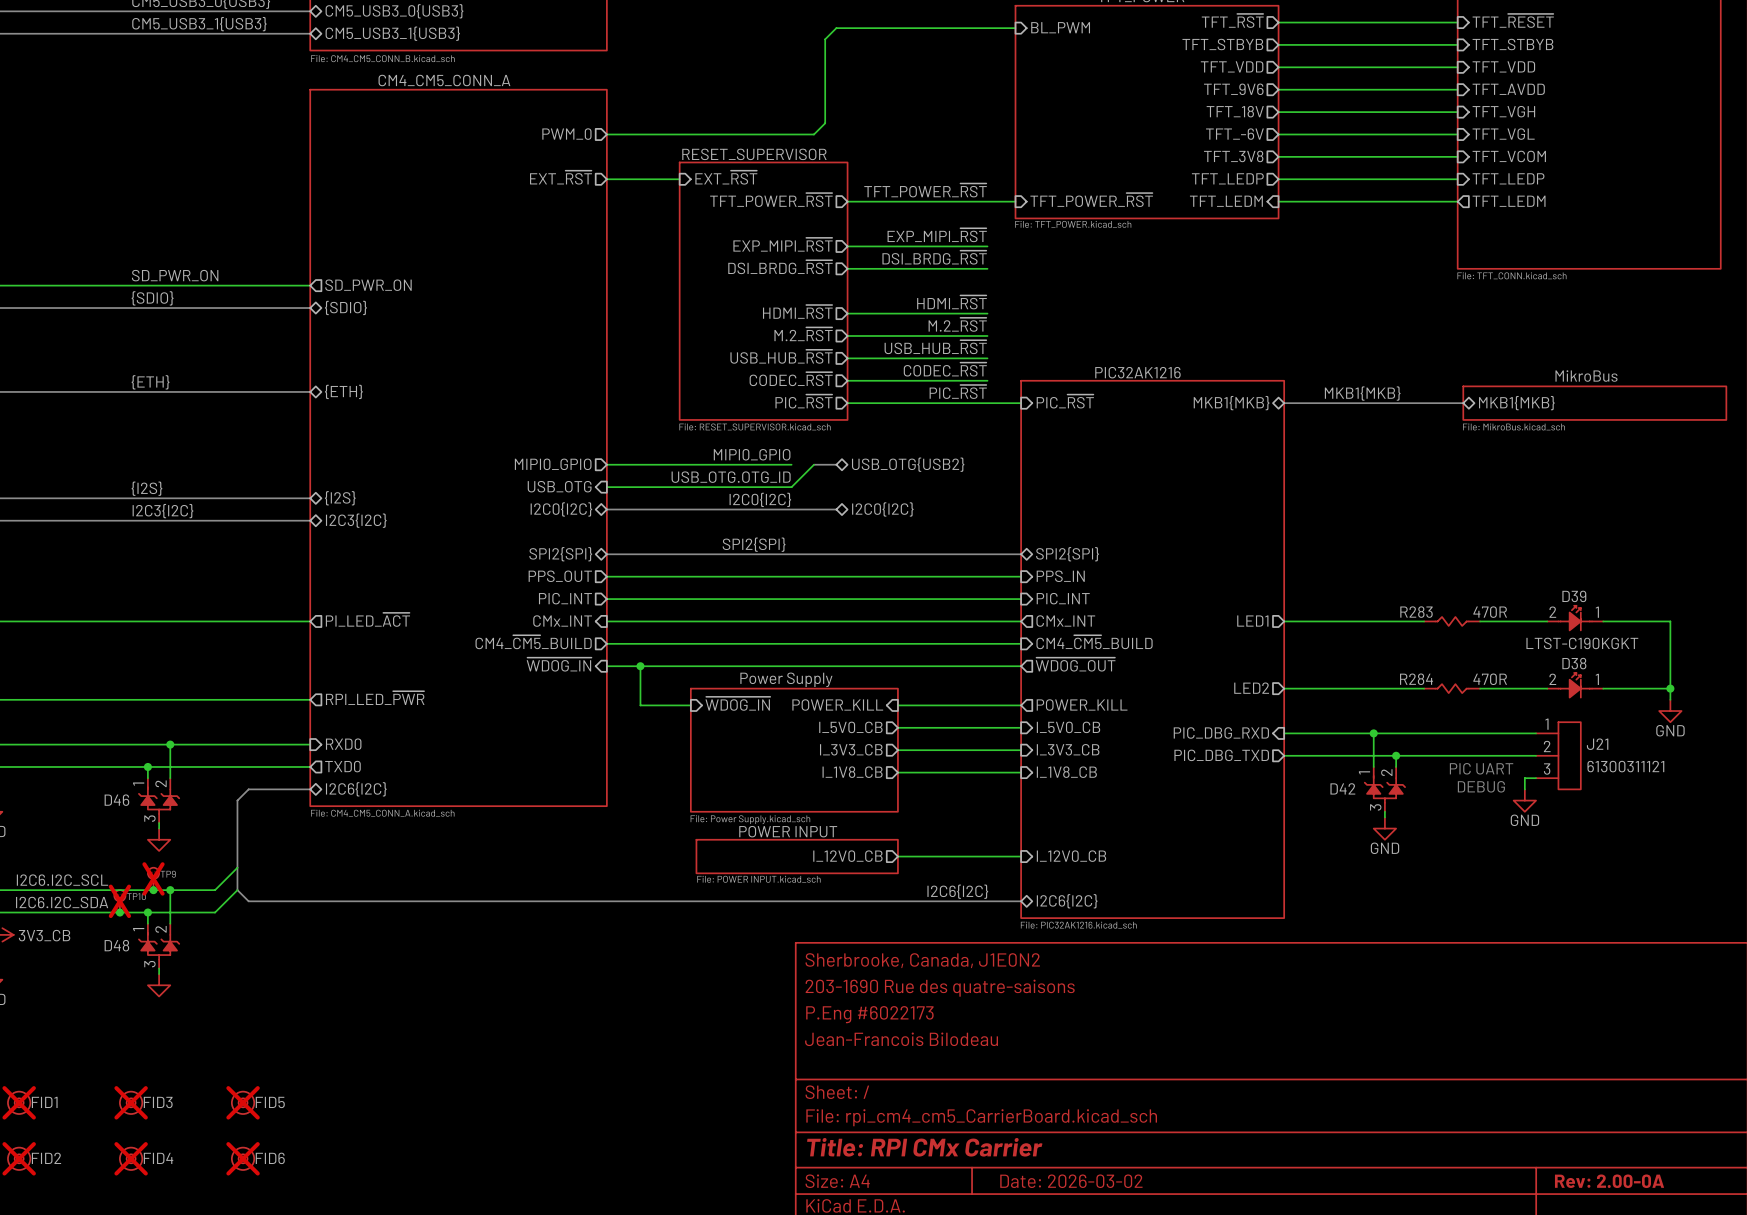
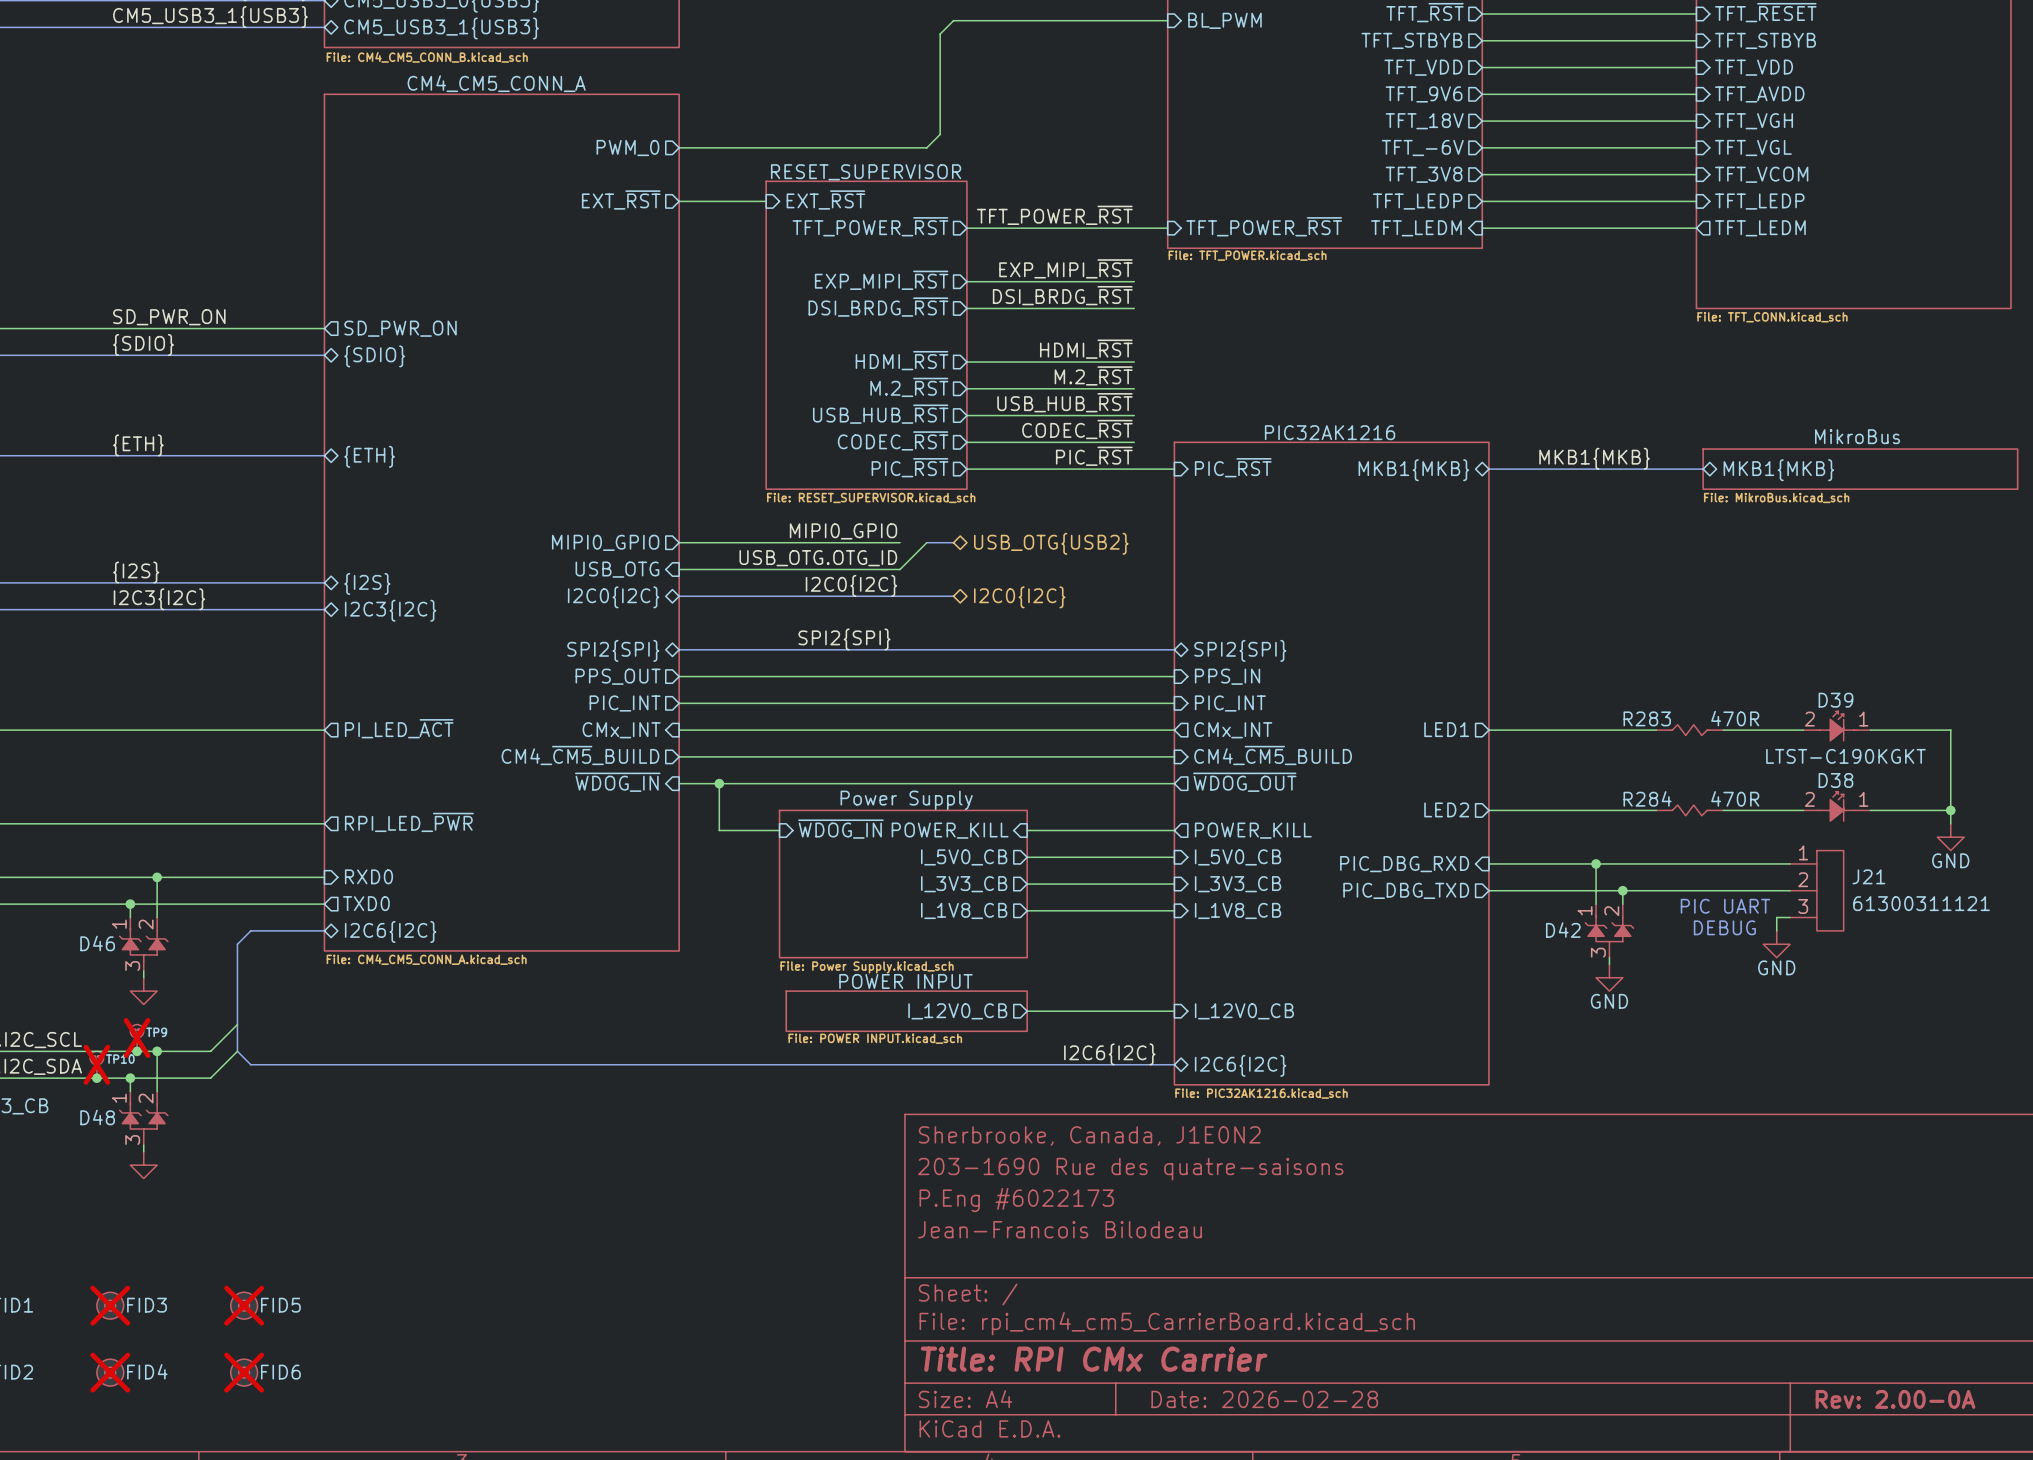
title block: Date: 2026-03-02 (1071, 1181) -> Date: 2026-02-28 (1264, 1399)

